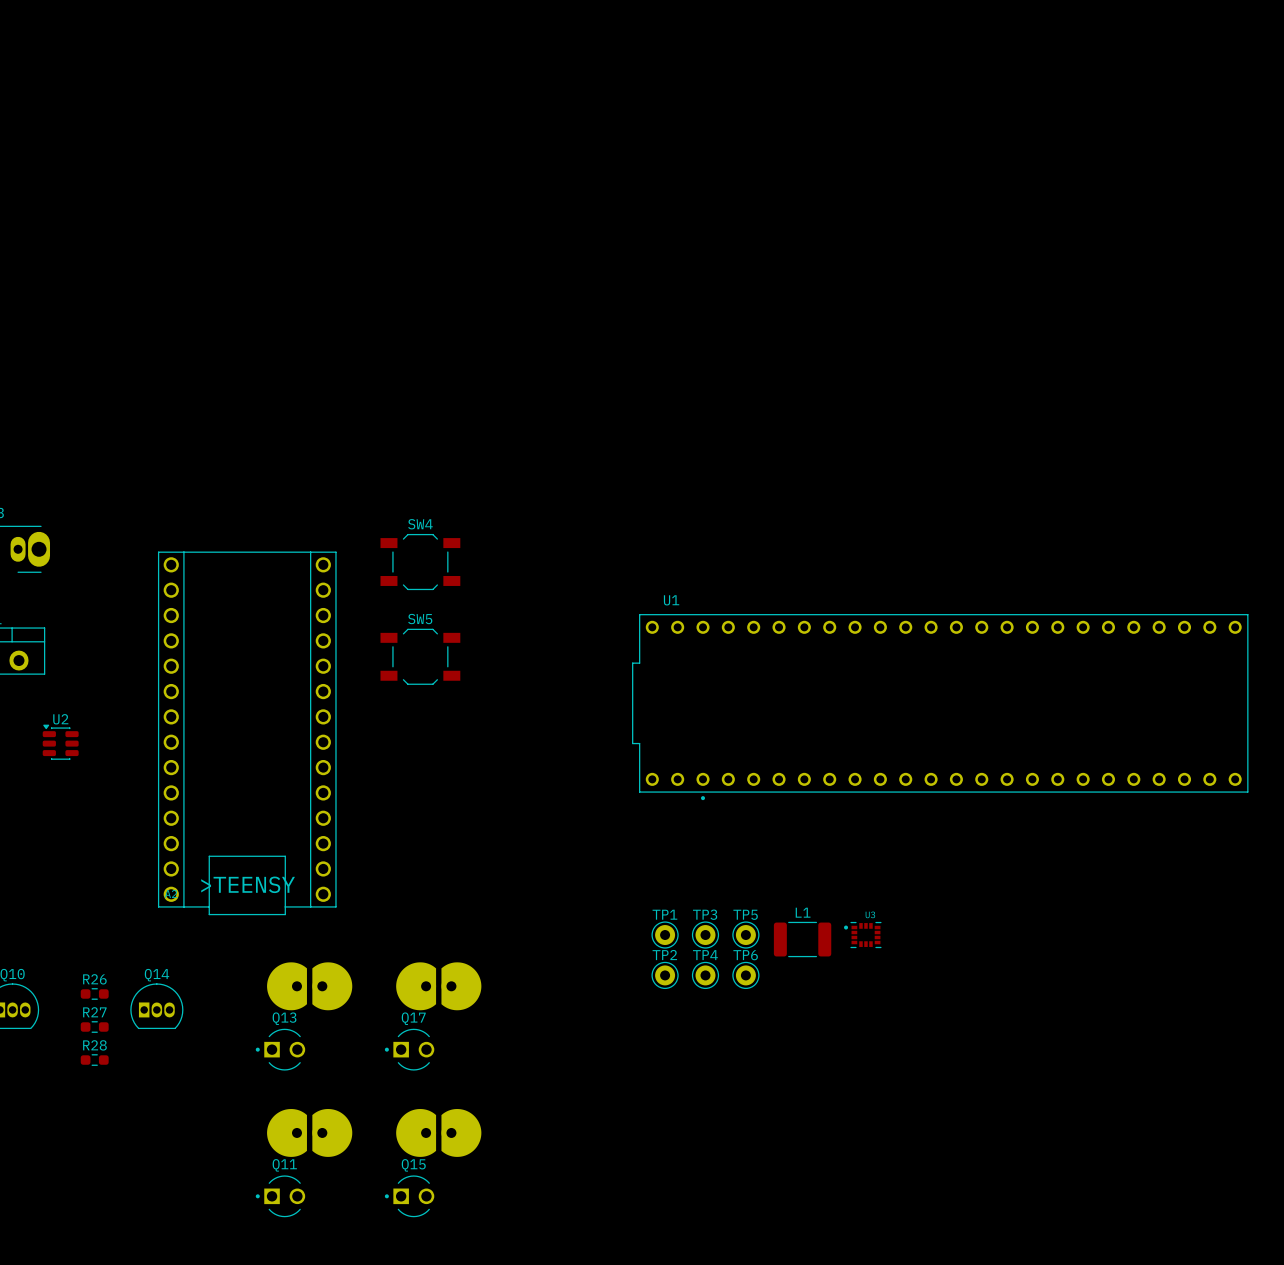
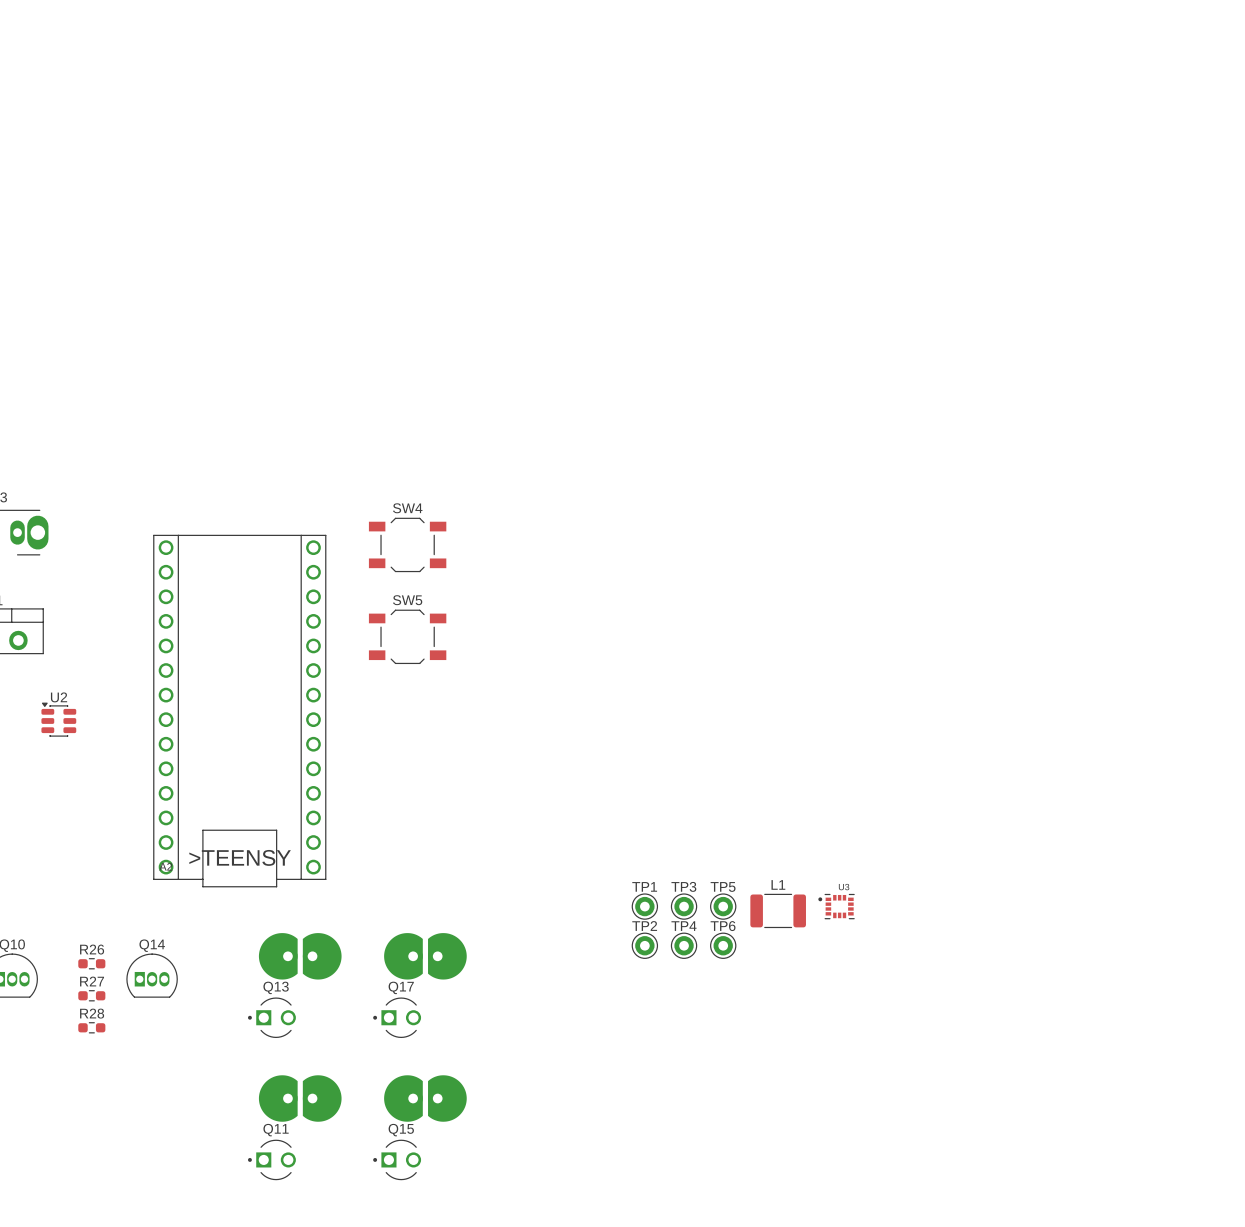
U1: (940, 707) -> none

